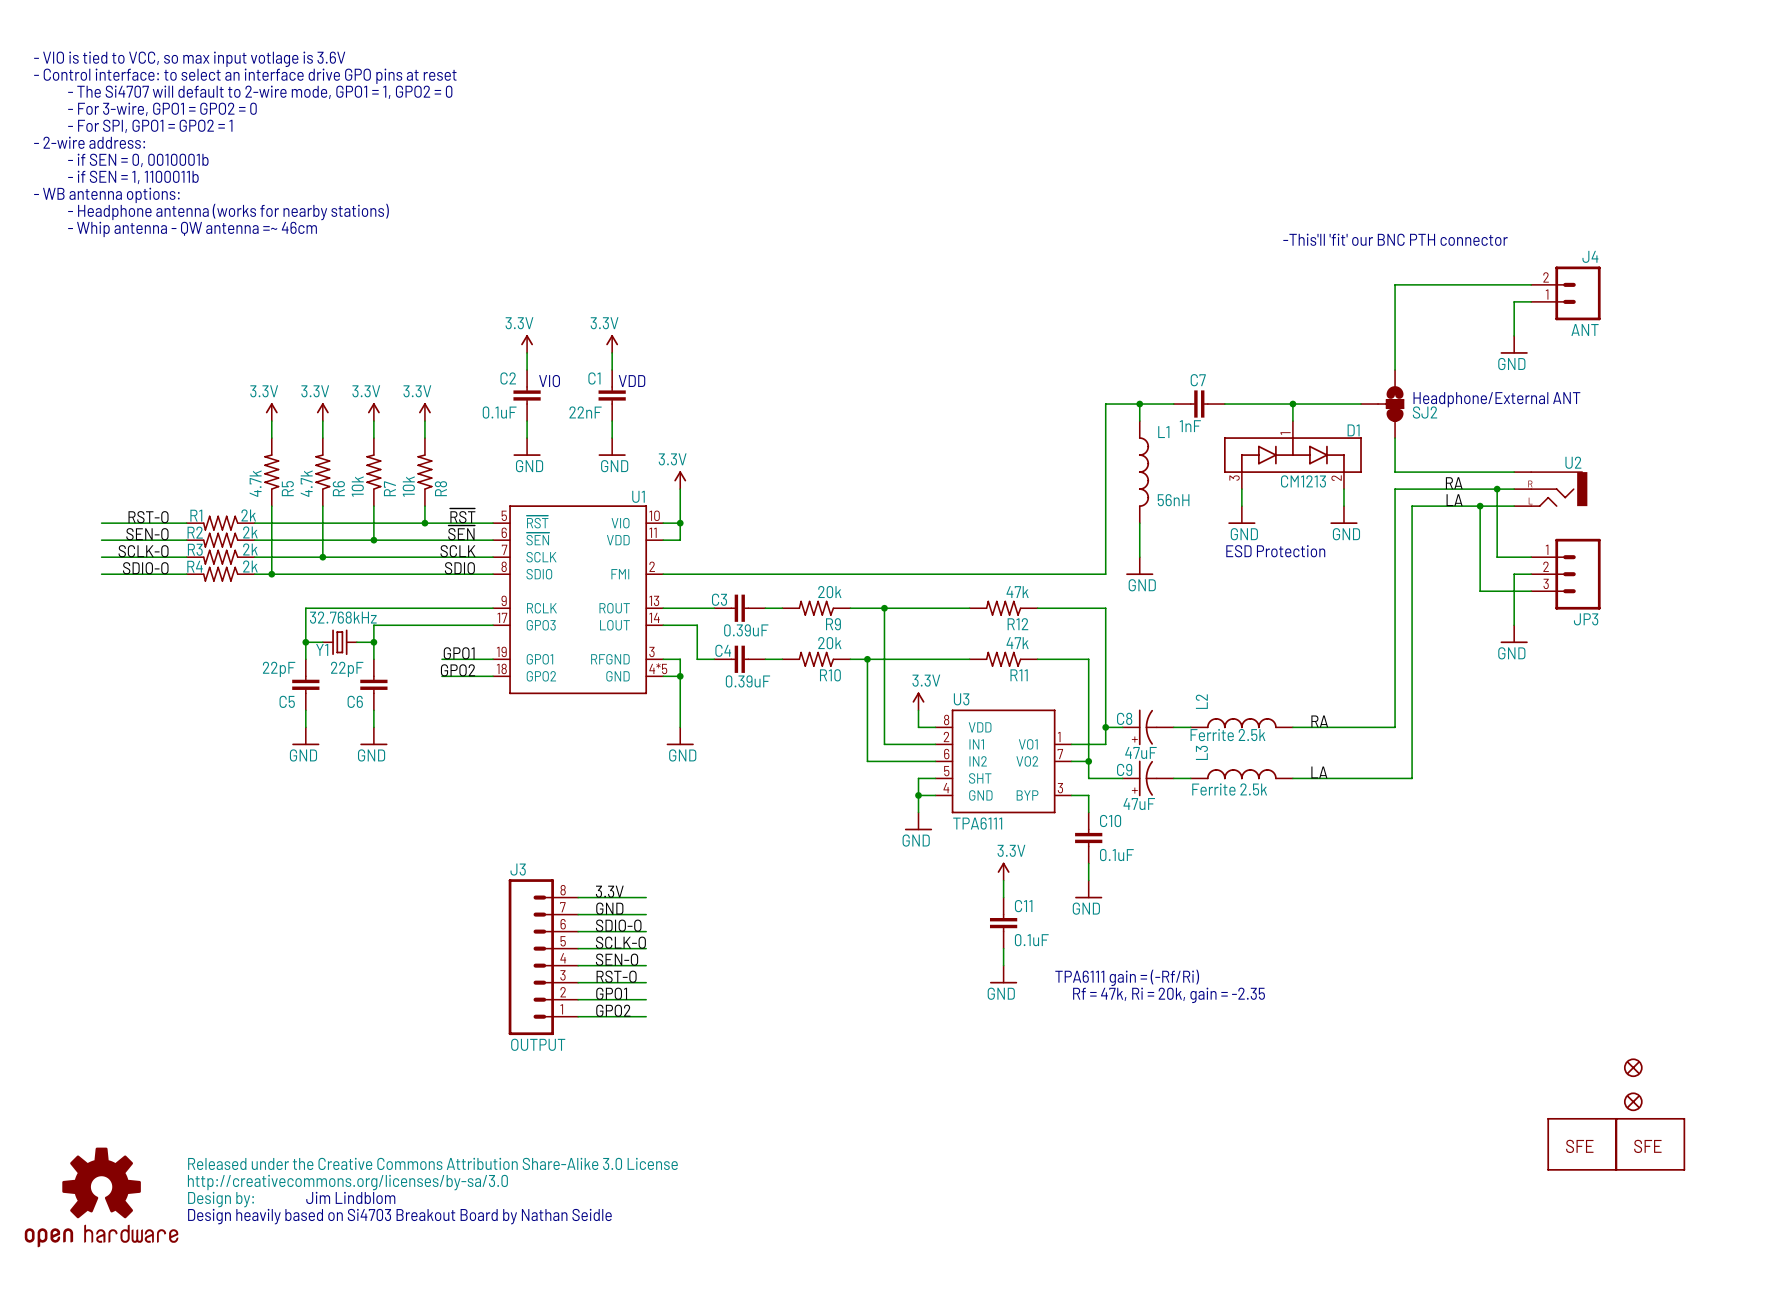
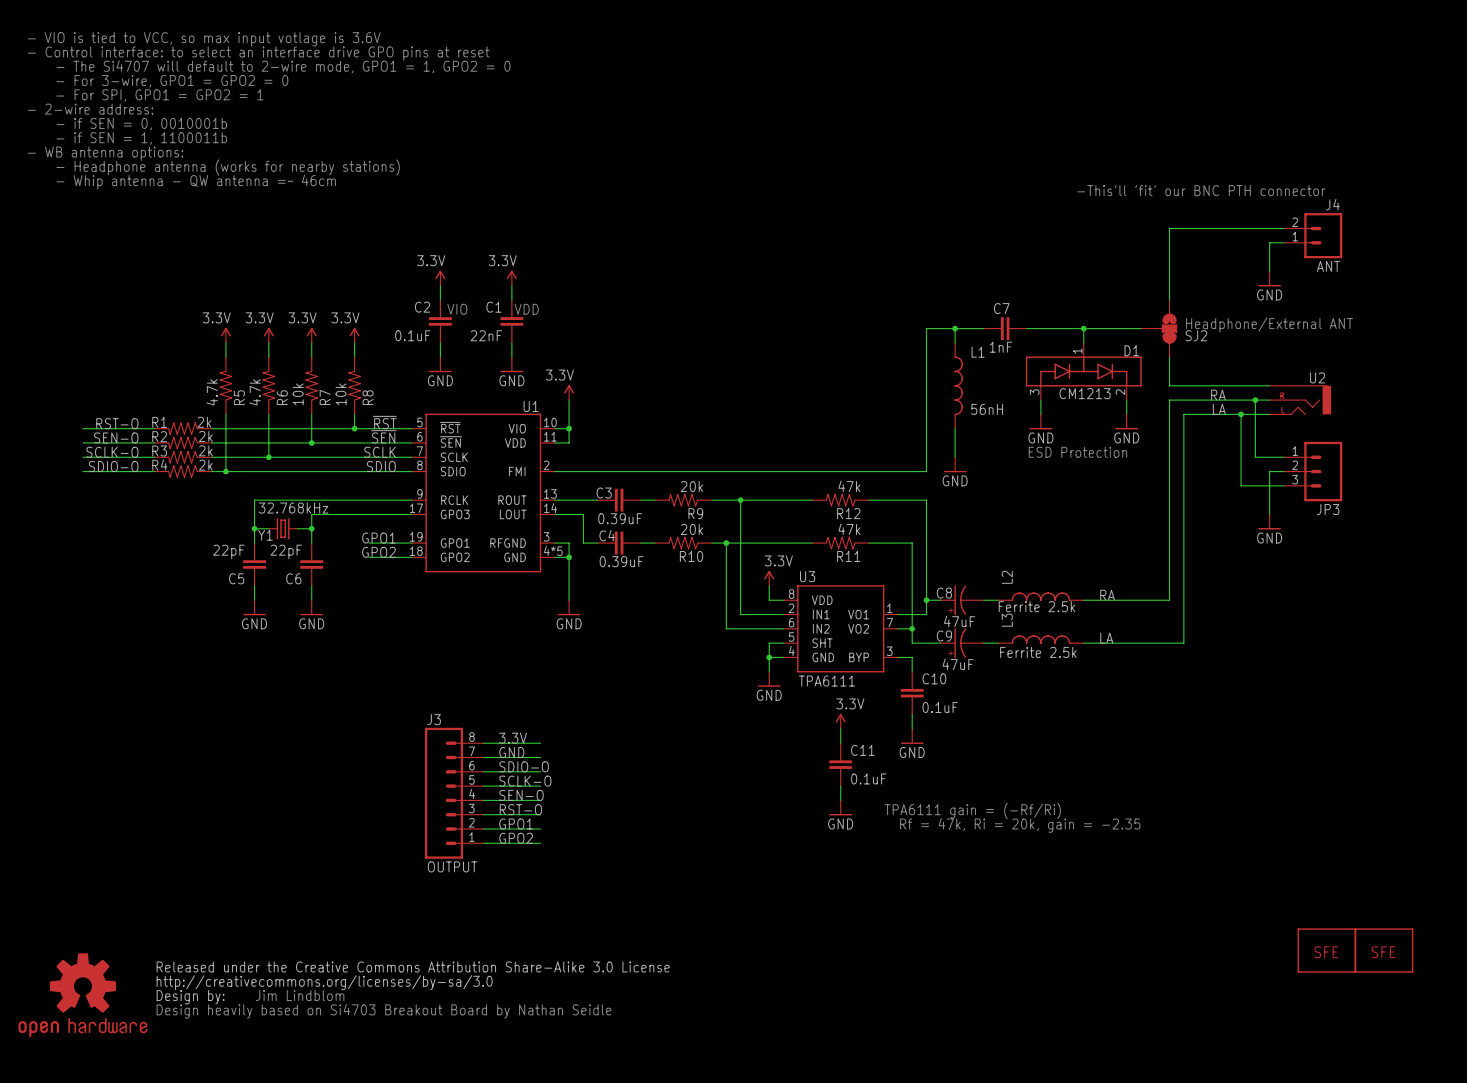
part: (1633, 1067) -> none
part: (1633, 1101) -> none

